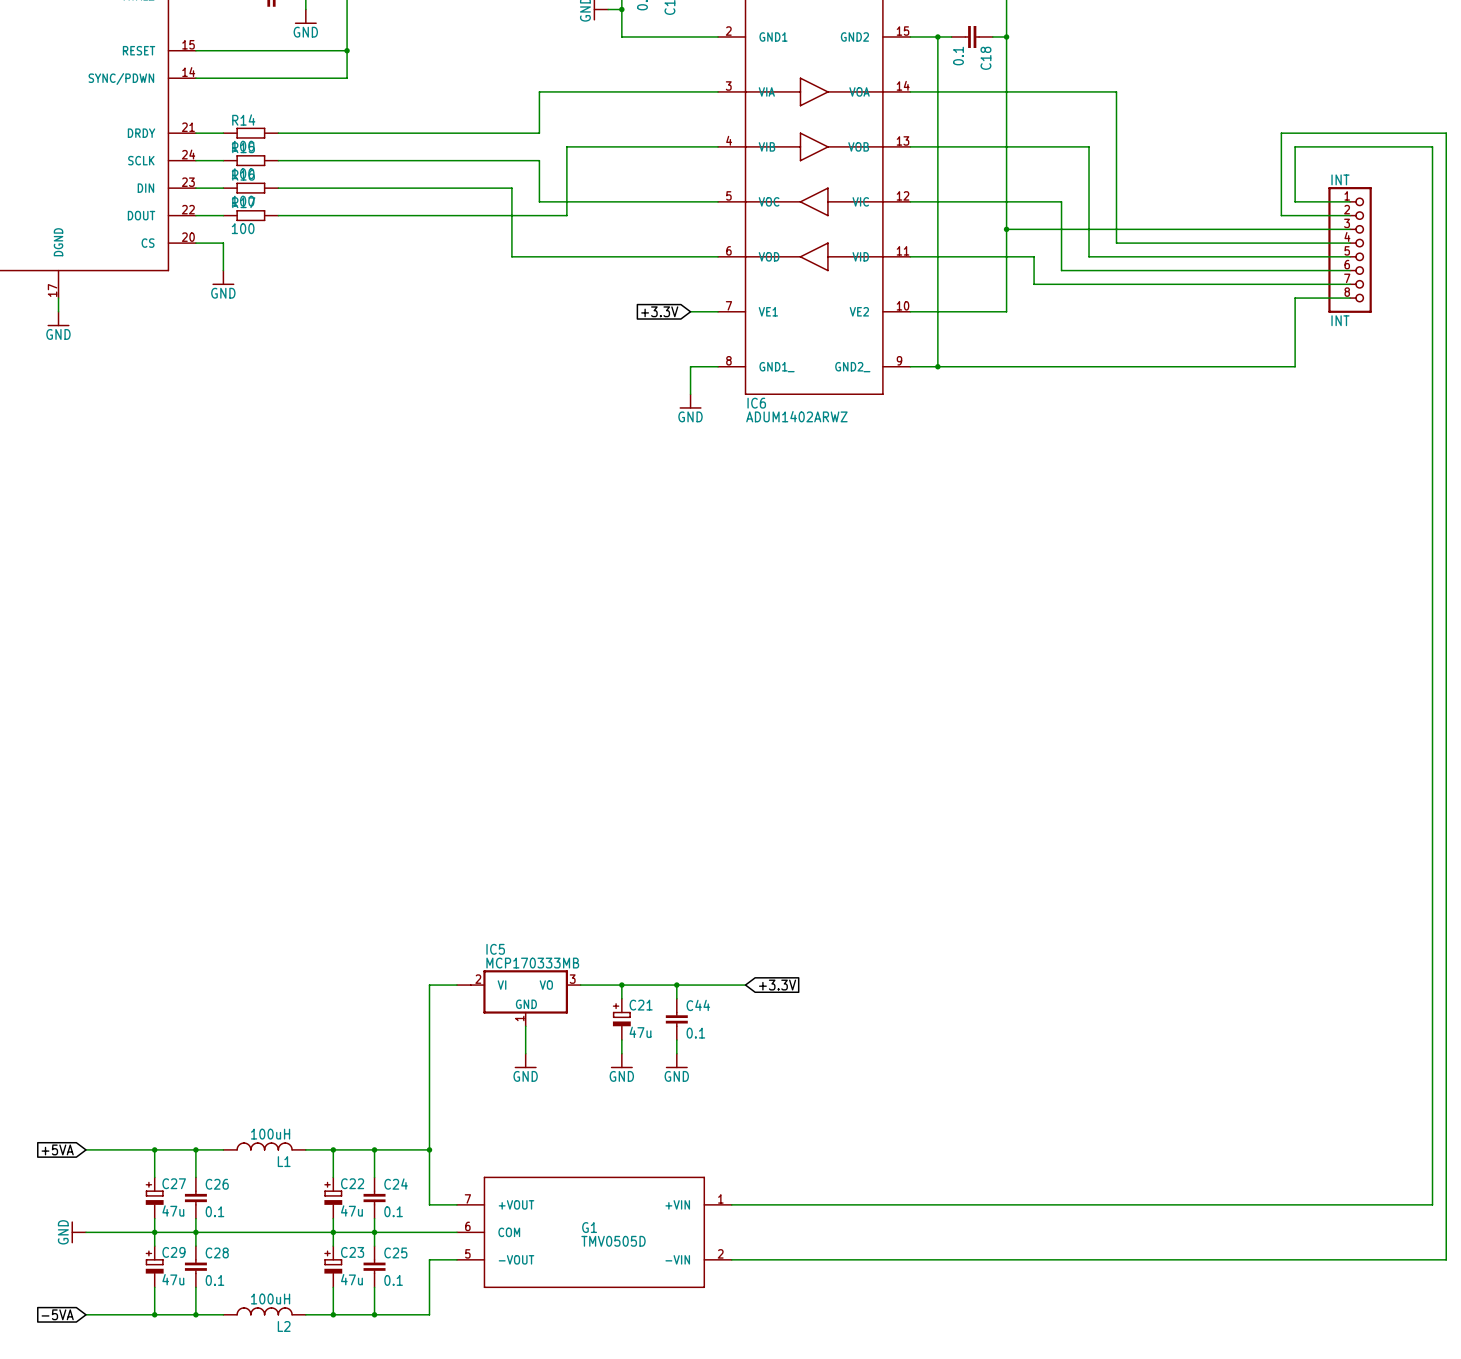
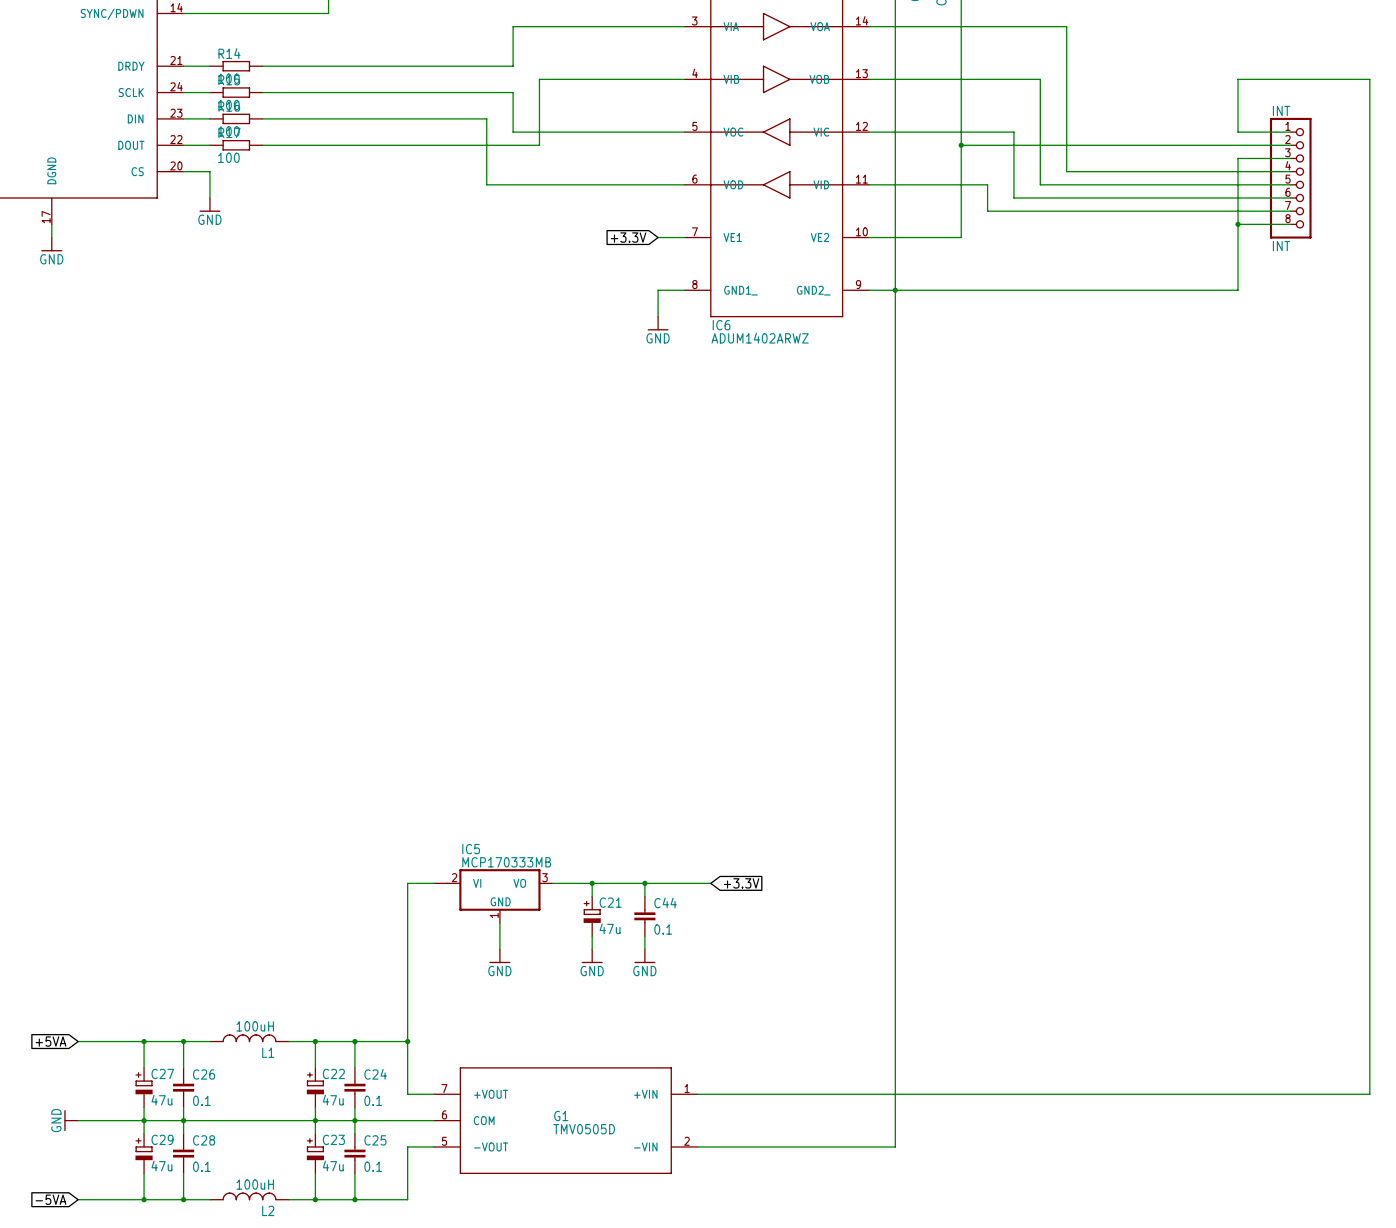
wire: none -> (961, 145) (1224, 145)
wire: (1281, 215) (1281, 133) (1446, 133) (1446, 1259) (937, 1259) -> (895, 290) (895, 1146)
wire: (1006, 229) (1295, 229) -> (1238, 224) (1238, 158)
junction position: (1006, 229) -> (961, 145)
junction: none -> (1238, 224)

